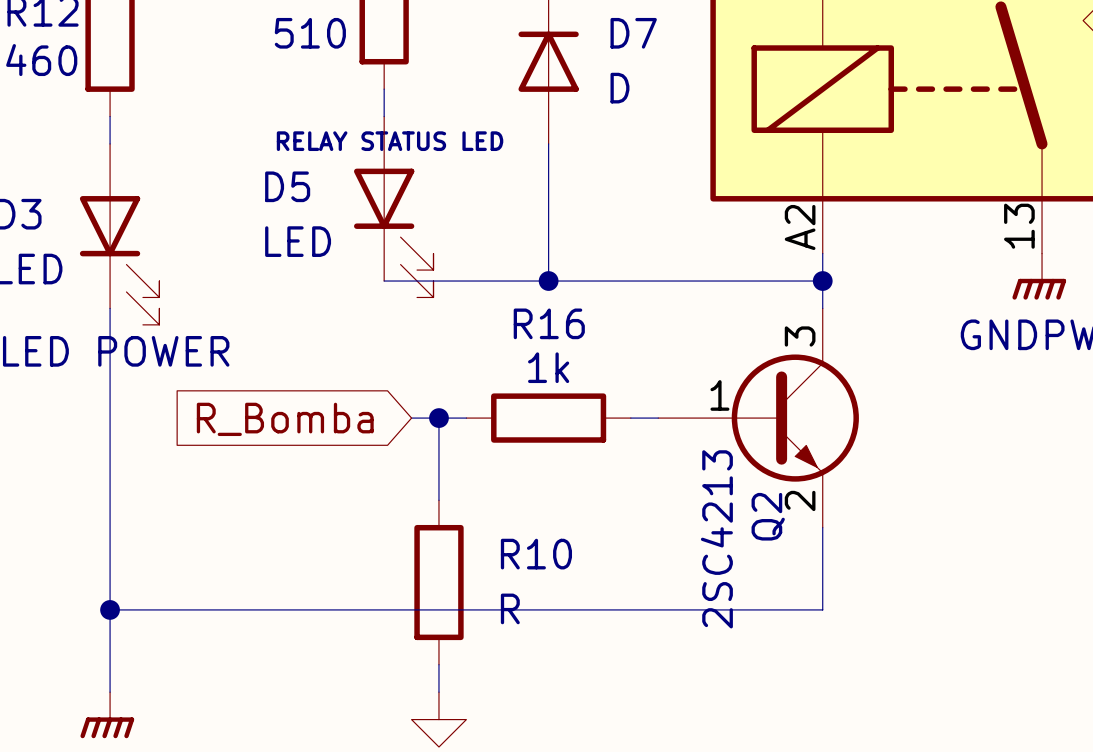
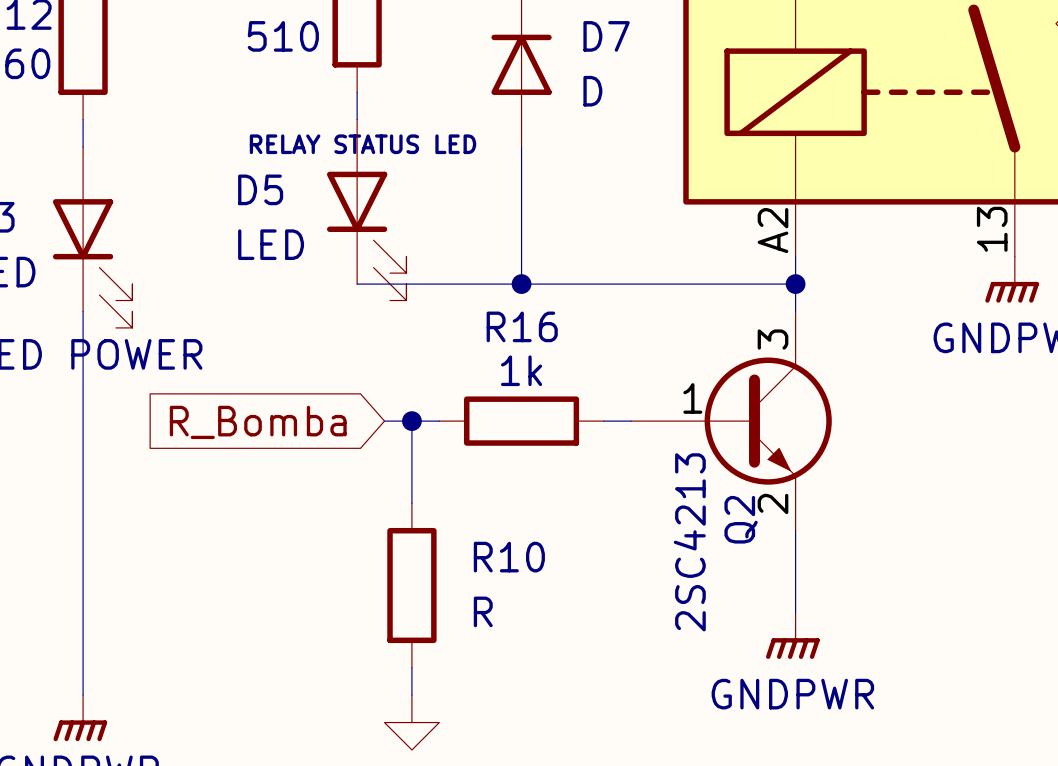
wire: (110, 609) (822, 609) -> none
junction: (110, 609) -> none
power symbol: none -> GNDPWR (792, 635)

